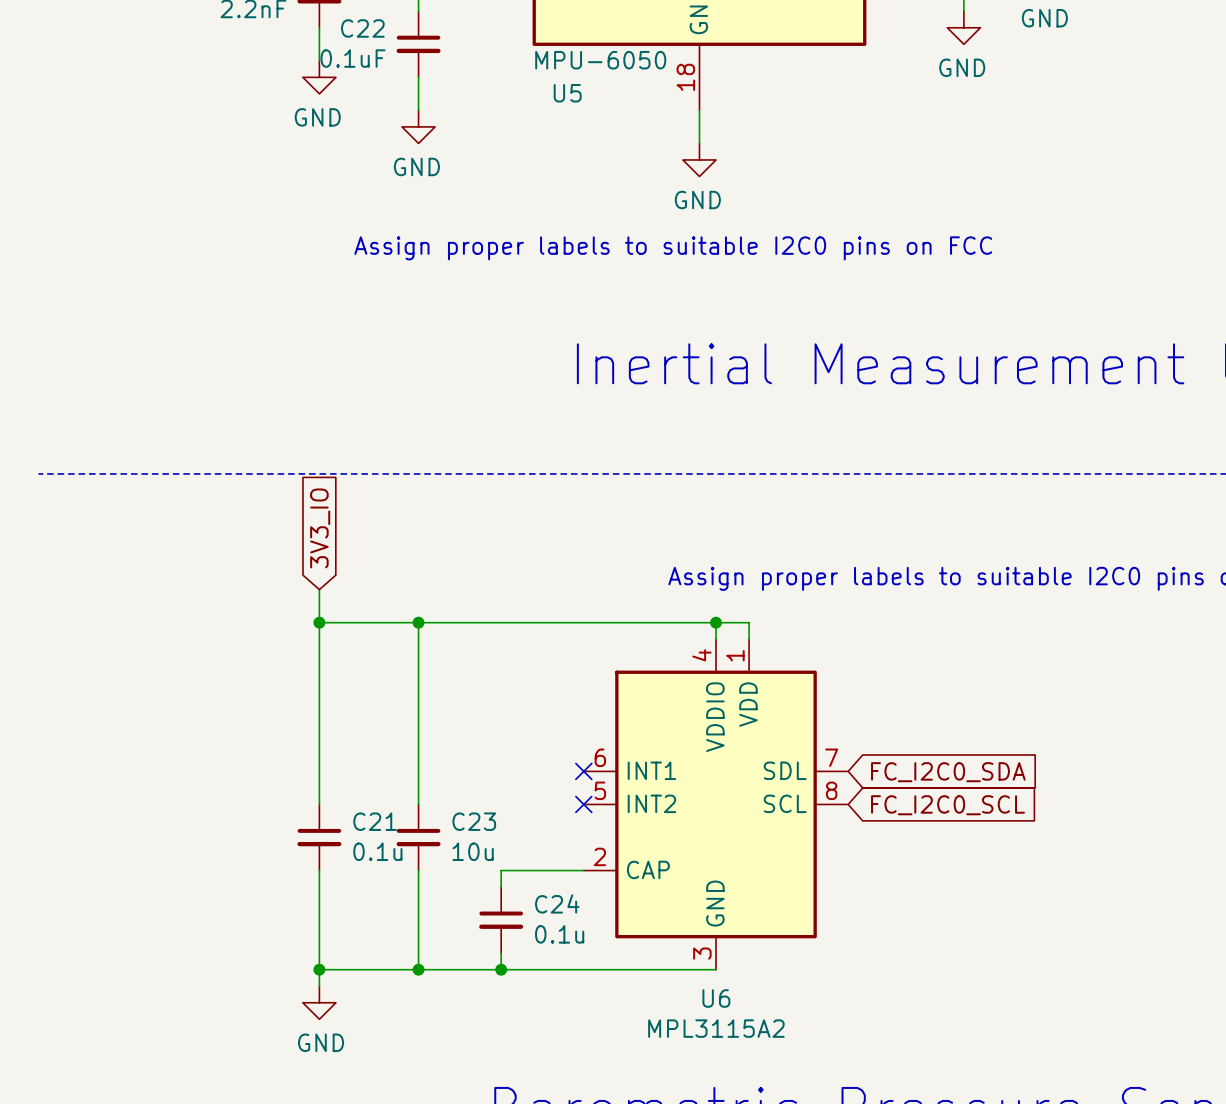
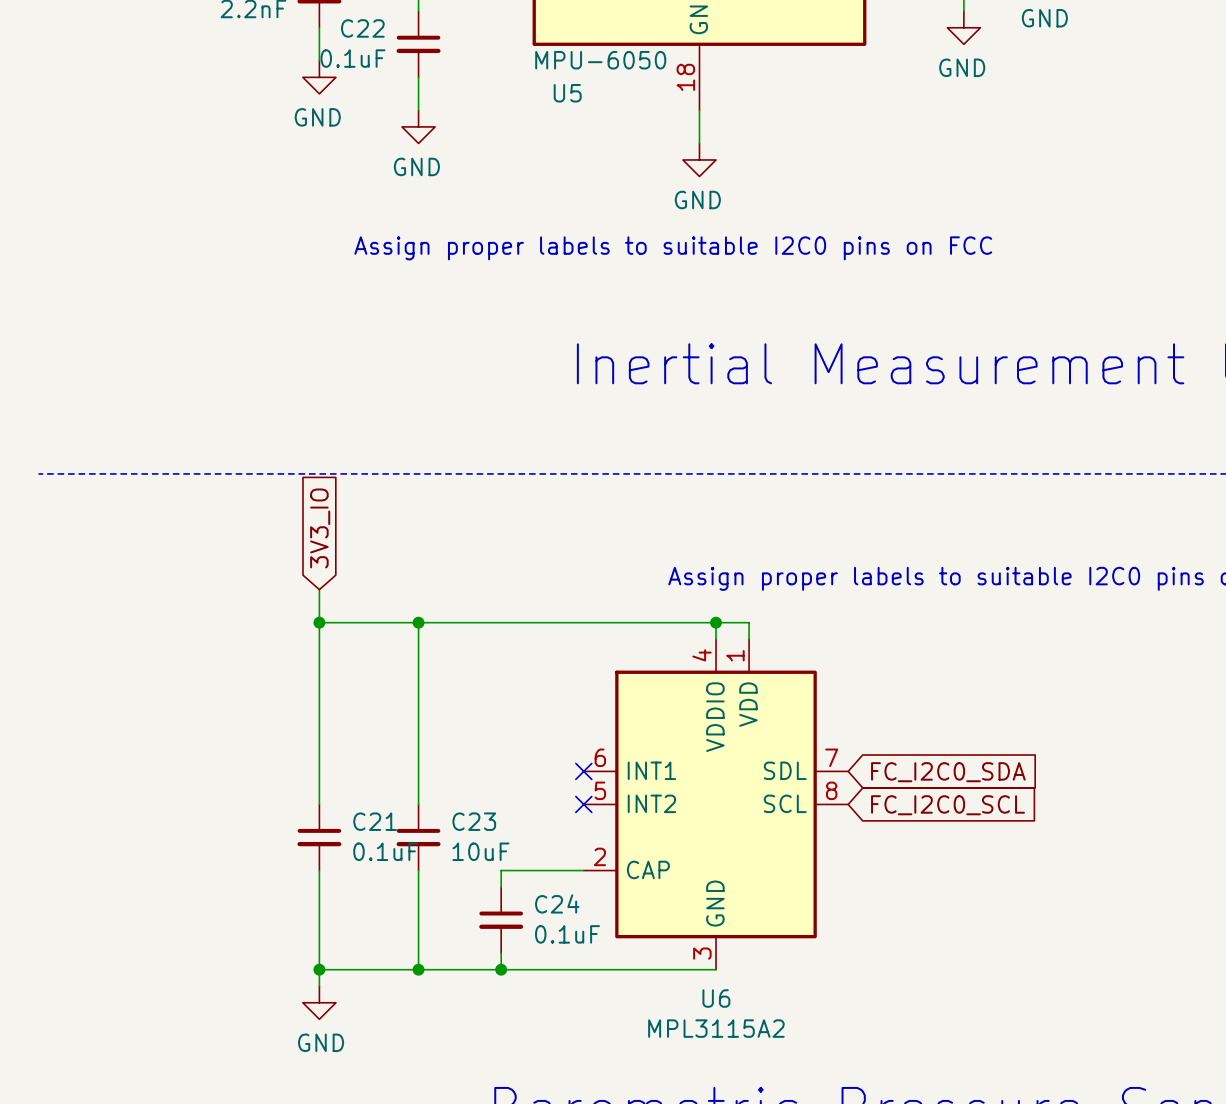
C21 value: 0.1u (377, 851) -> 0.1uF (385, 851)
C23 value: 10u (473, 851) -> 10uF (480, 851)
C24 value: 0.1u (559, 934) -> 0.1uF (567, 934)

